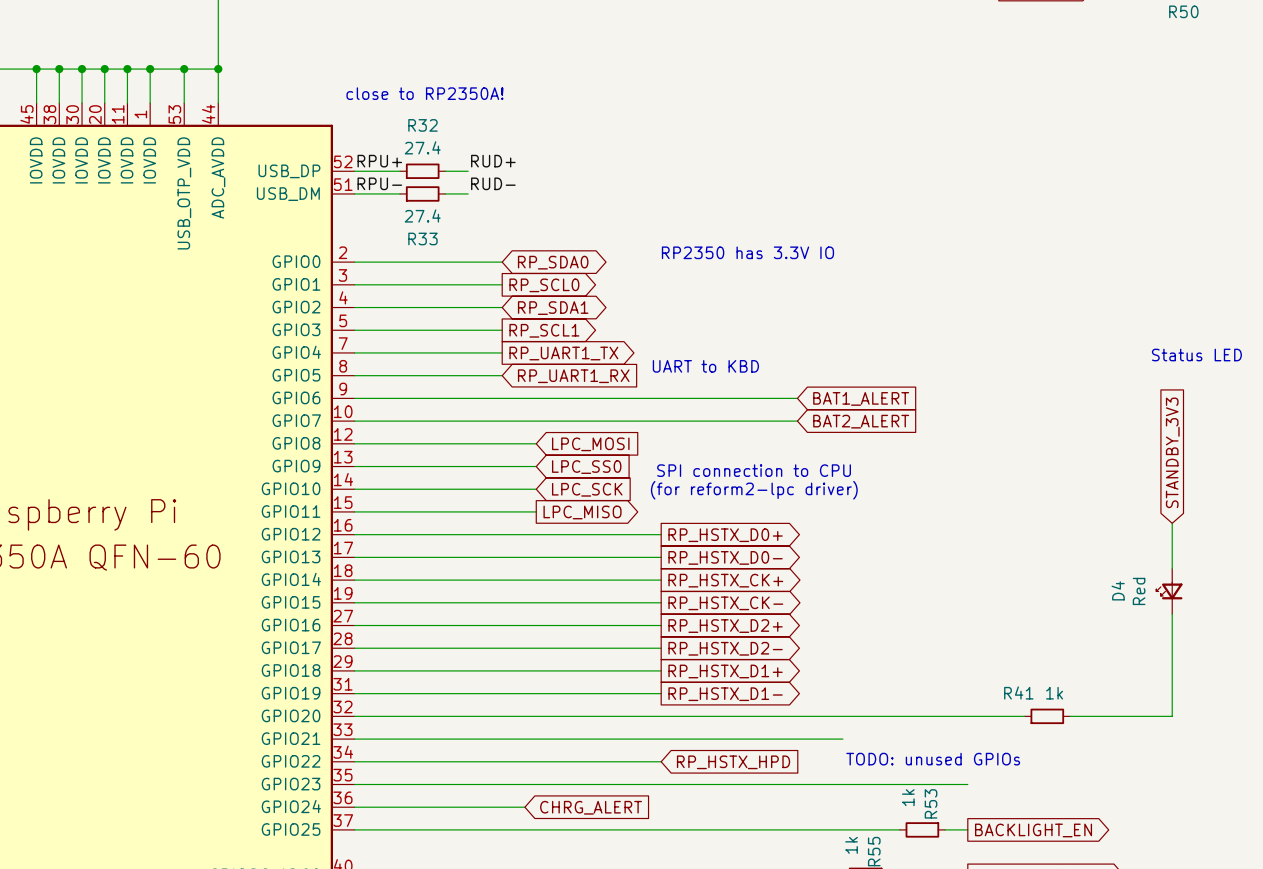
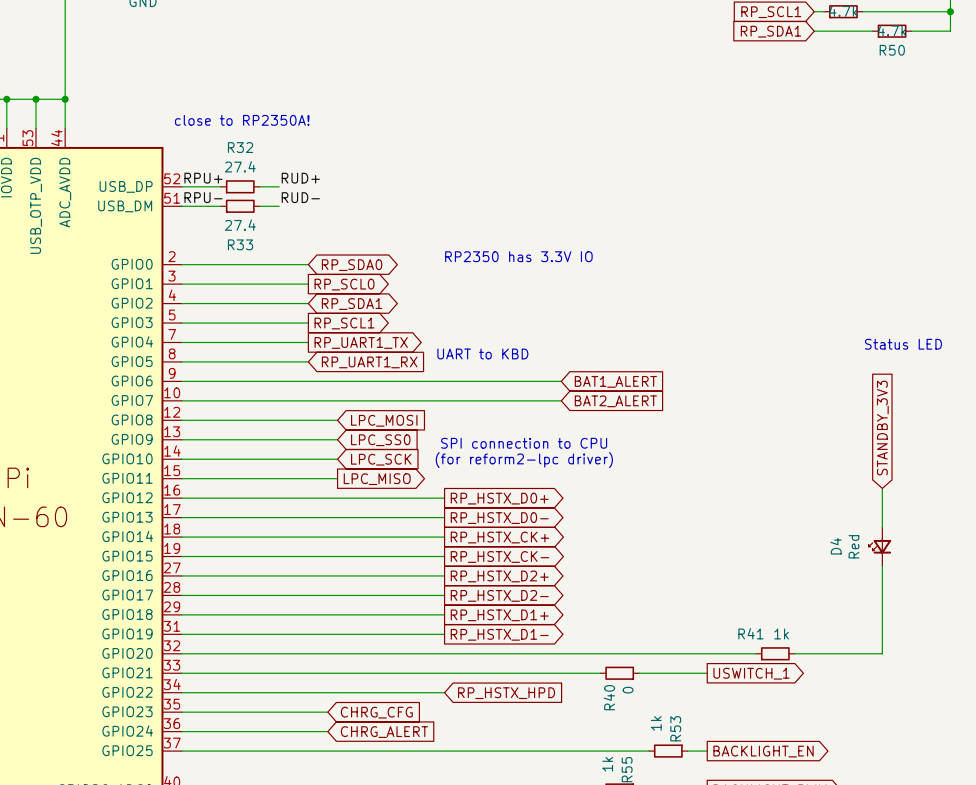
R40: none -> 0 (619, 673)
wire: none -> (639, 673) (707, 673)
global label: none -> USWITCH_1 (751, 673)
text: TODO: unused GPIOs (933, 759) -> none
wire: (524, 784) (967, 784) -> none
global label: none -> CHRG_CFG (376, 712)

